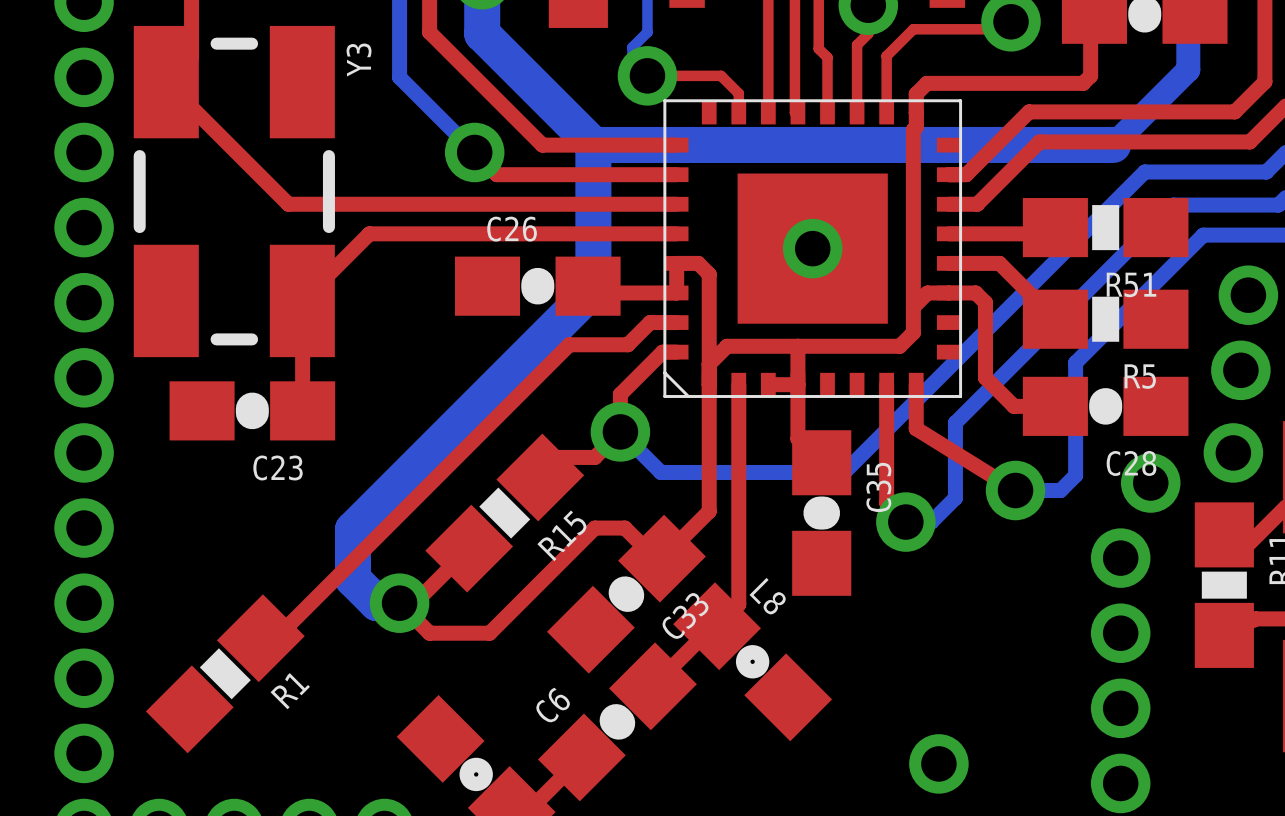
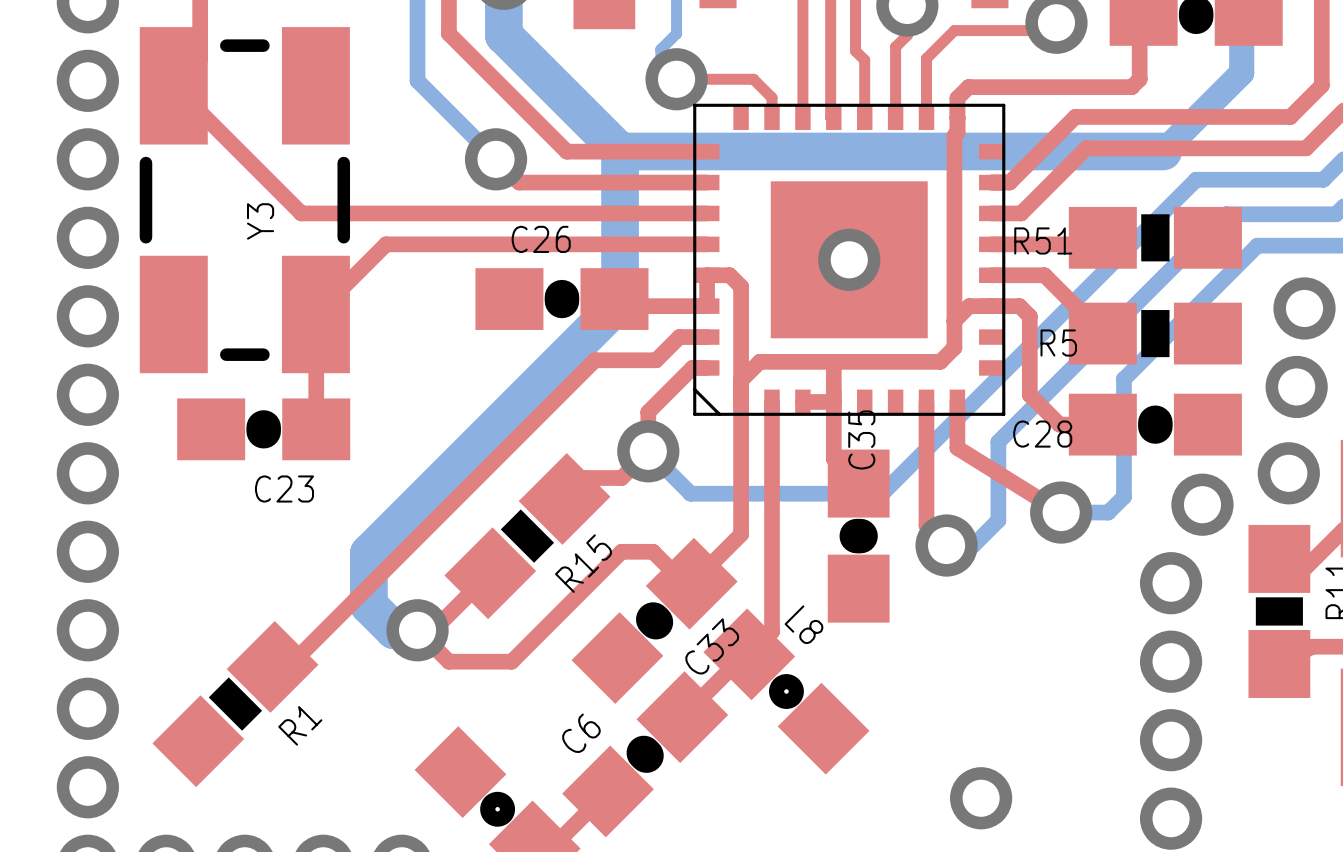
Y3 name position: Y3 (359, 60) -> Y3 (260, 221)
R51 name position: R51 (1131, 284) -> R51 (1043, 240)
R5 name position: R5 (1140, 376) -> R5 (1058, 343)
C28 name position: C28 (1131, 463) -> C28 (1042, 434)
C35 name position: C35 (878, 487) -> C35 (861, 439)

